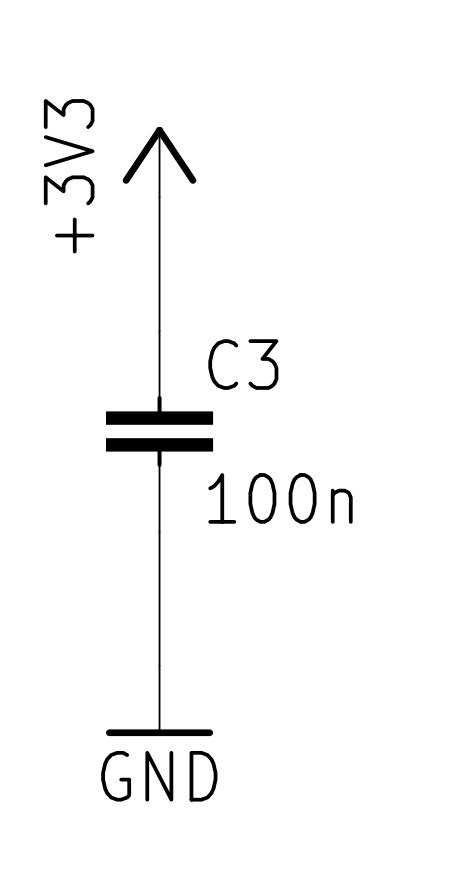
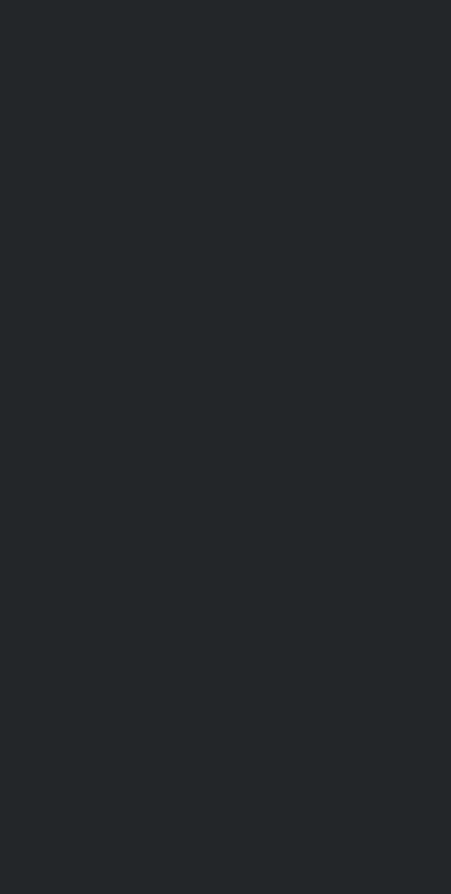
power symbol: +3V3 (159, 162) -> none
wire: (159, 197) (159, 331) -> none
C3: 100n (159, 431) -> none
wire: (159, 531) (159, 665) -> none
power symbol: GND (159, 700) -> none

